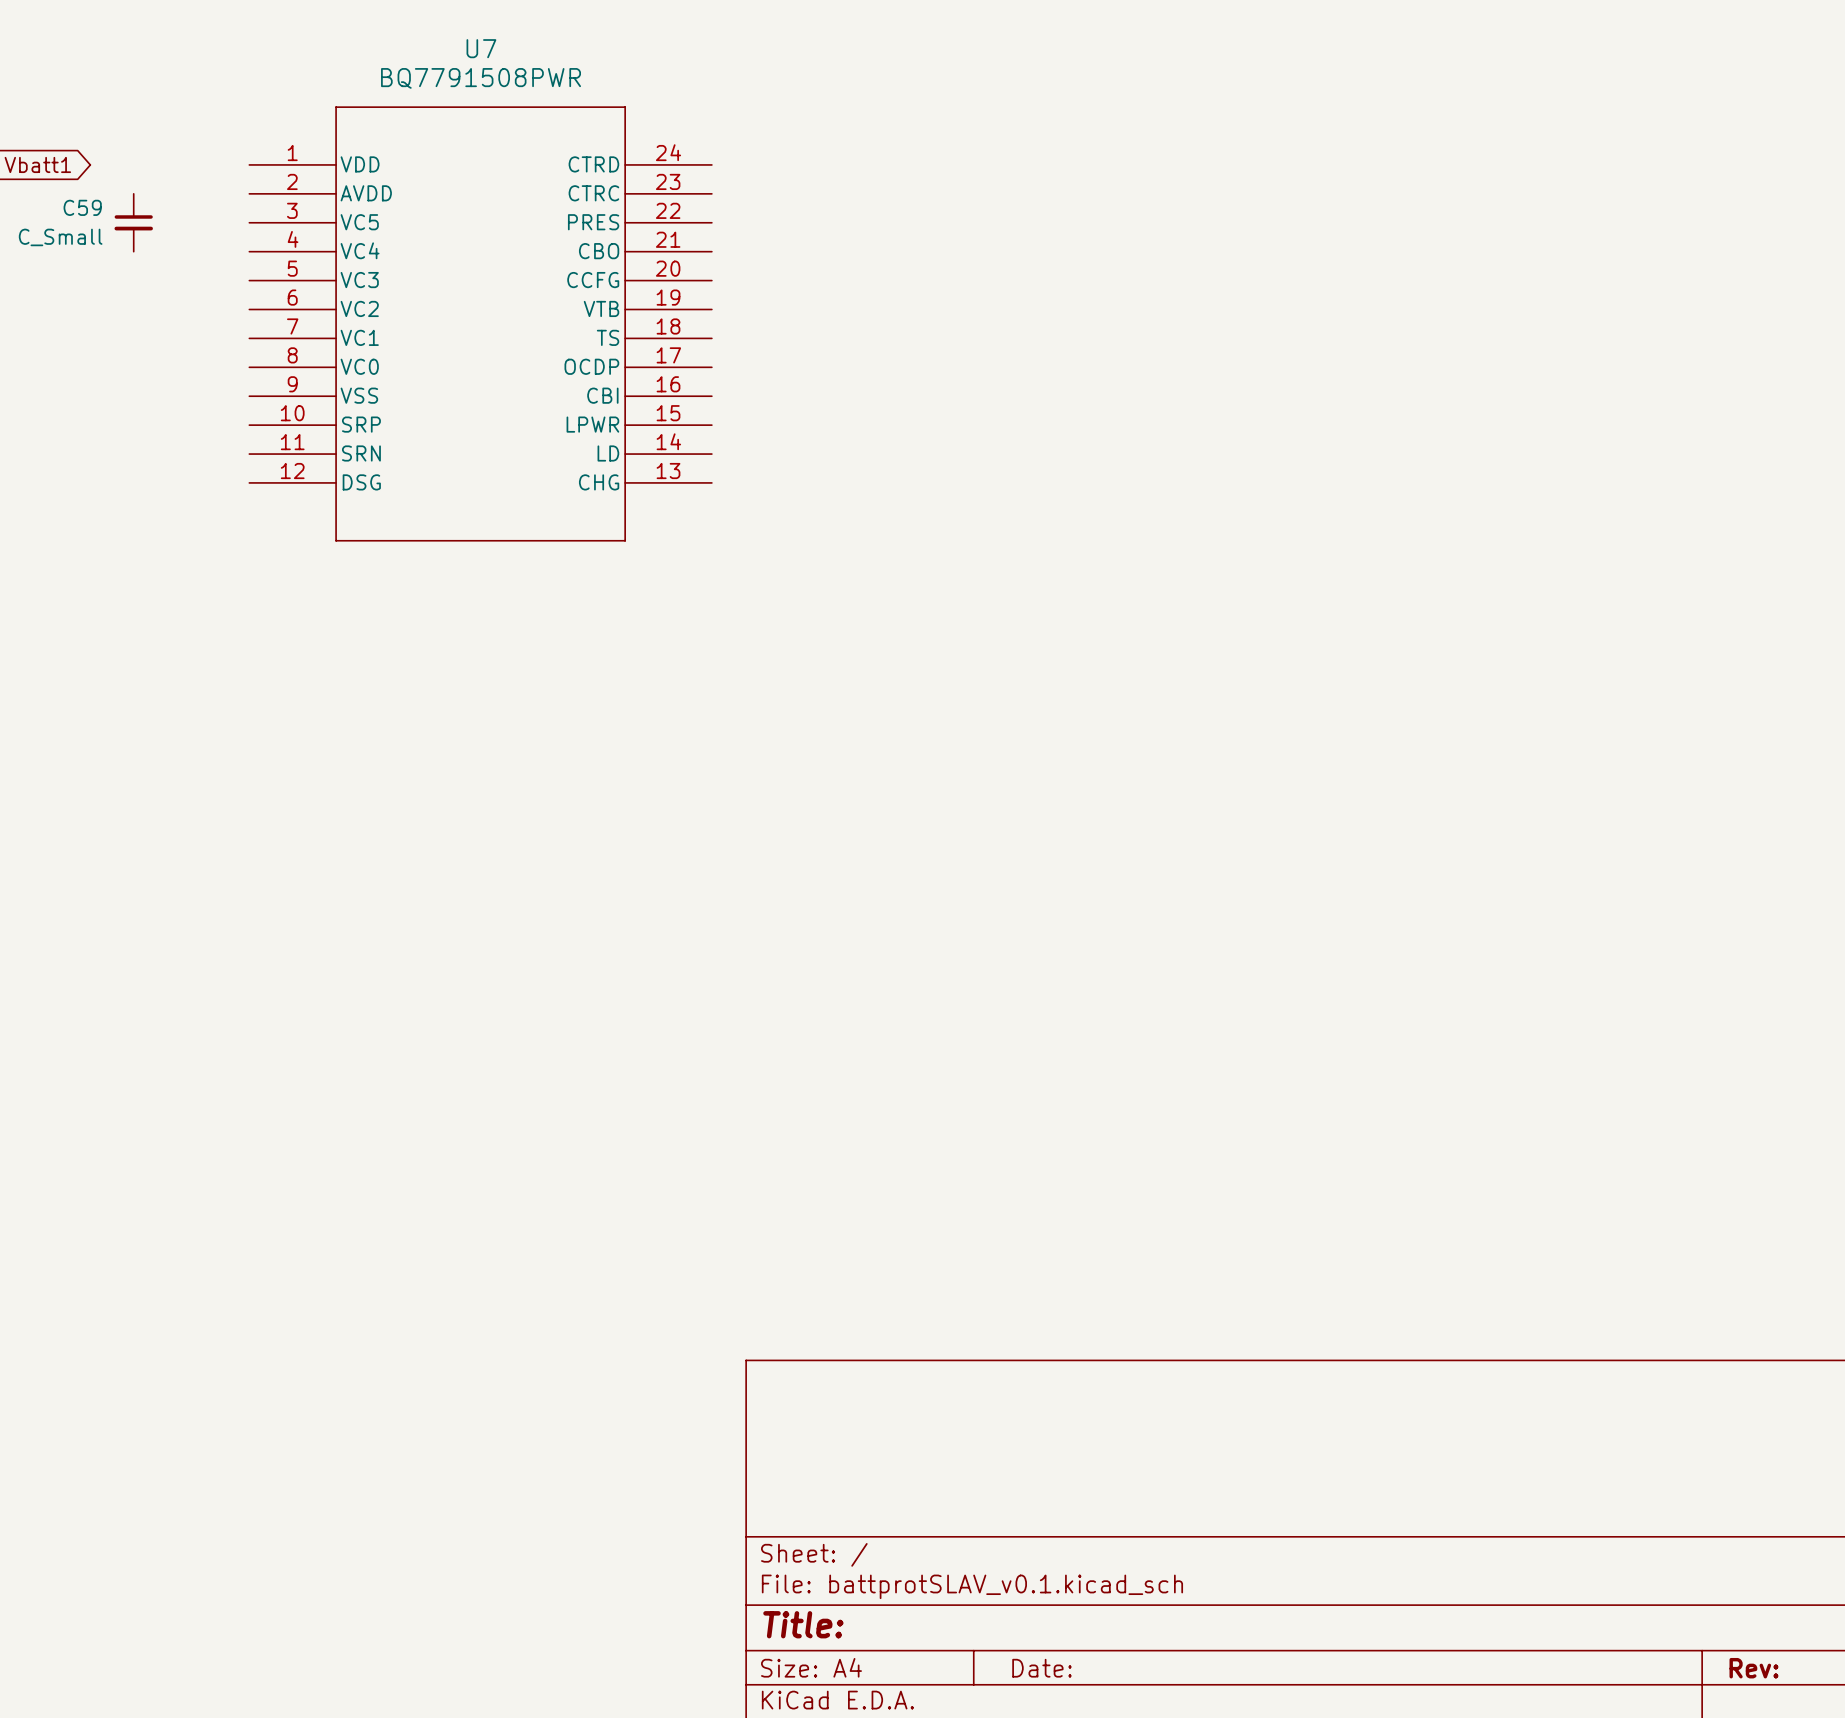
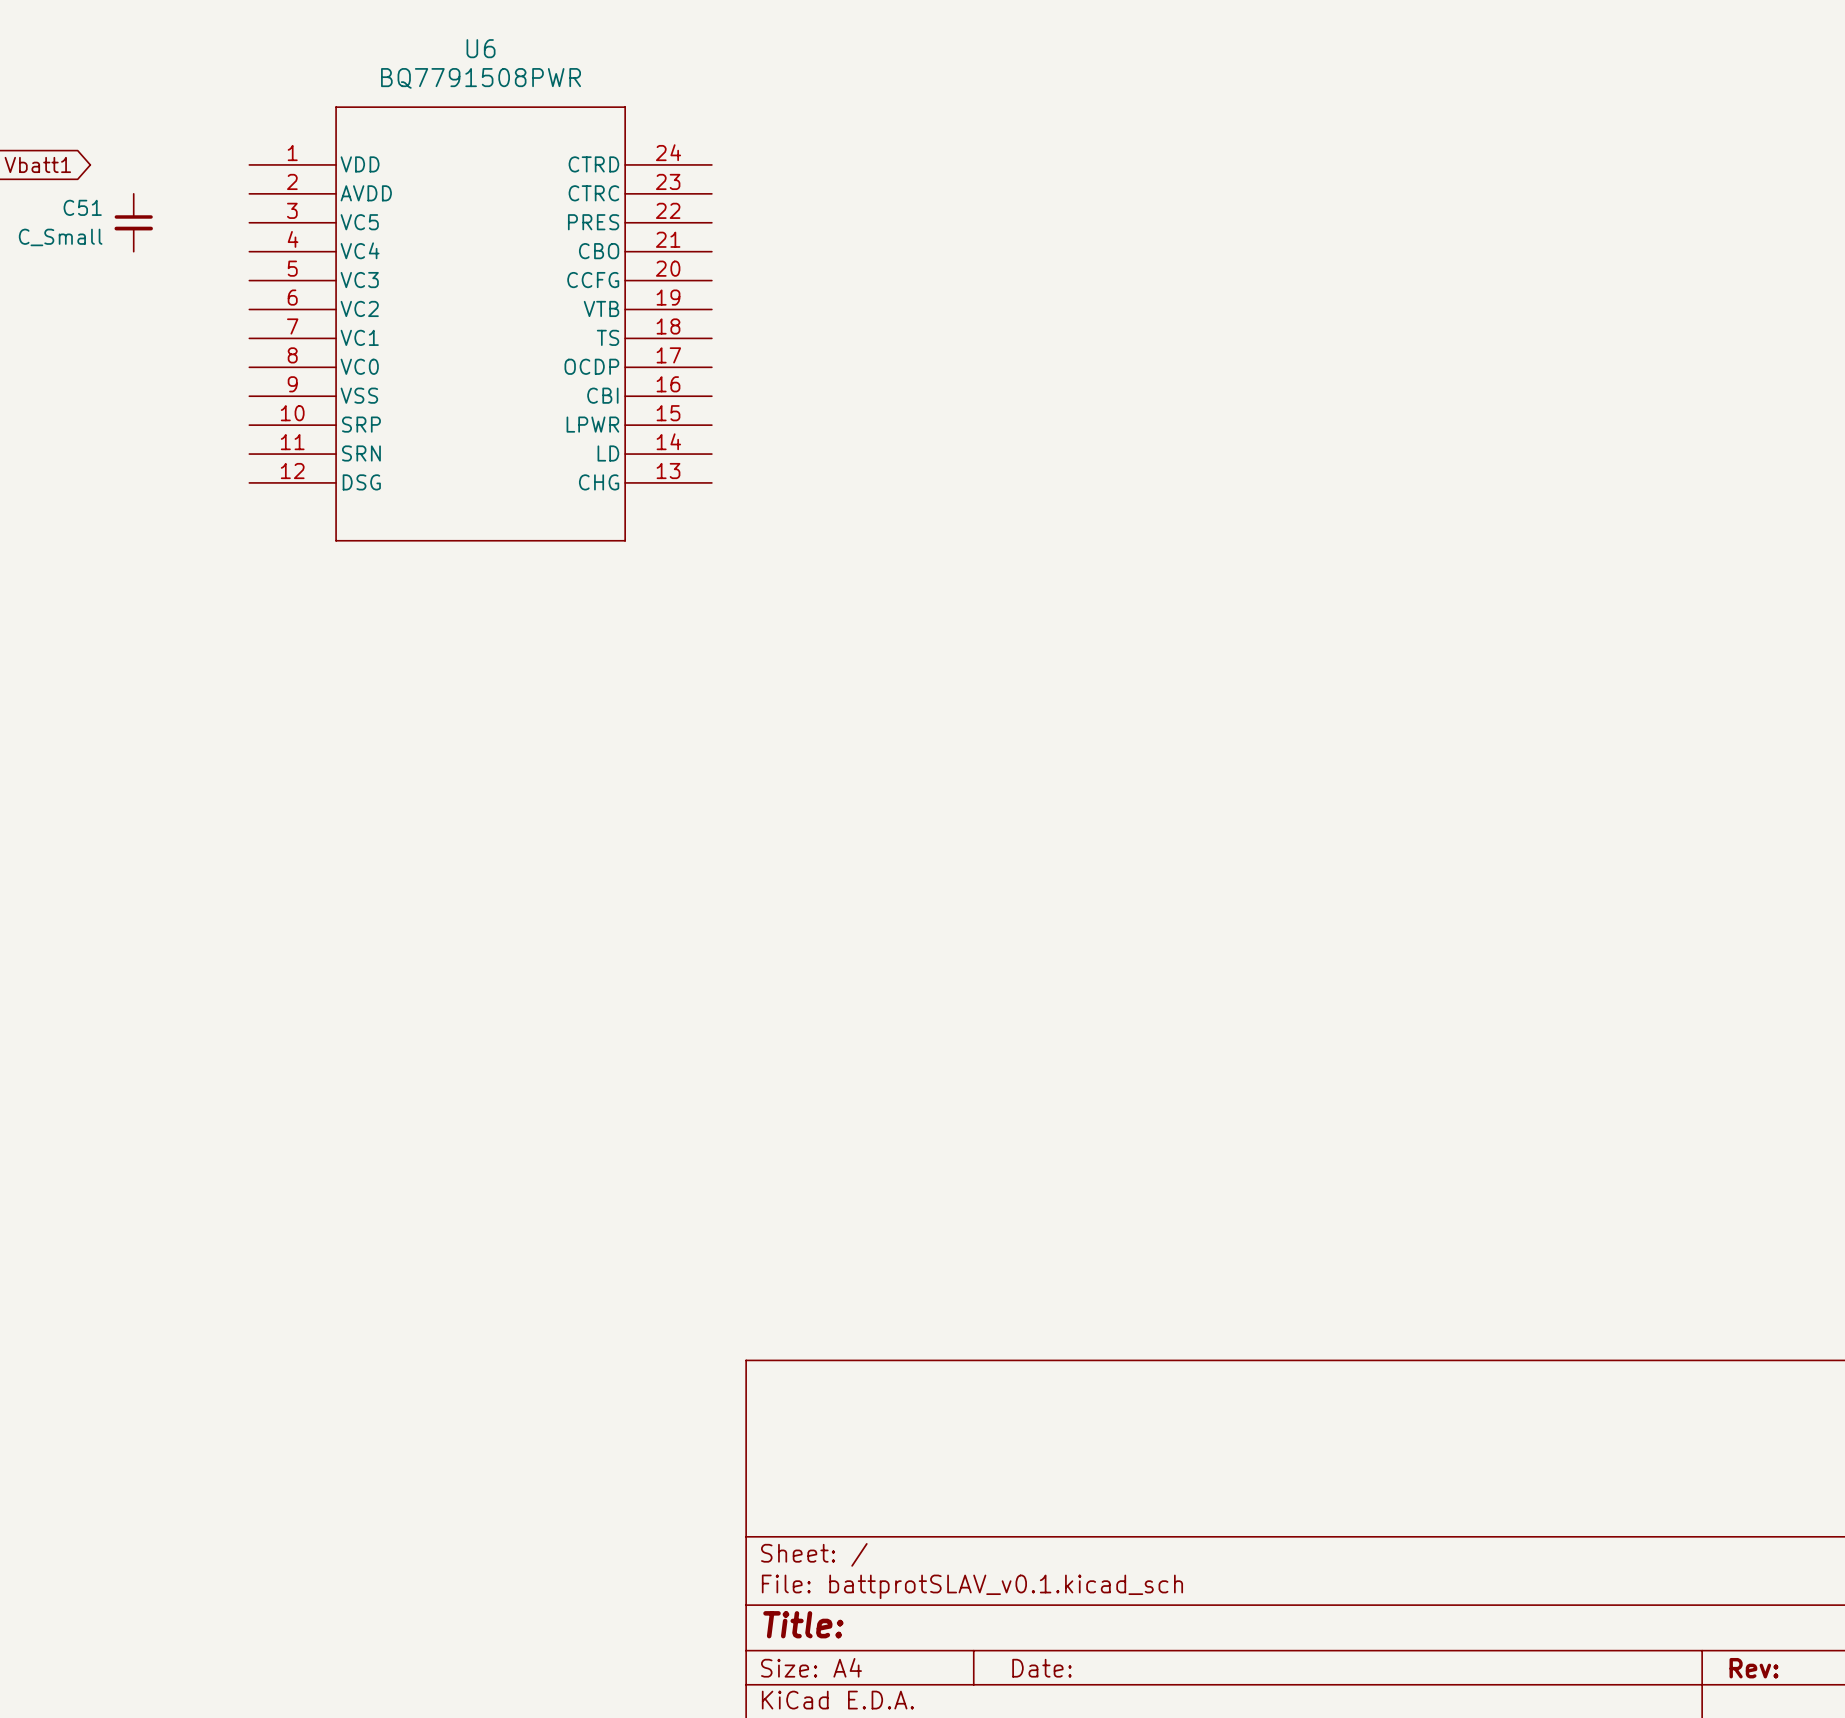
U7 name: U7 (481, 48) -> U6 (481, 48)
C59 name: C59 (82, 207) -> C51 (82, 207)

